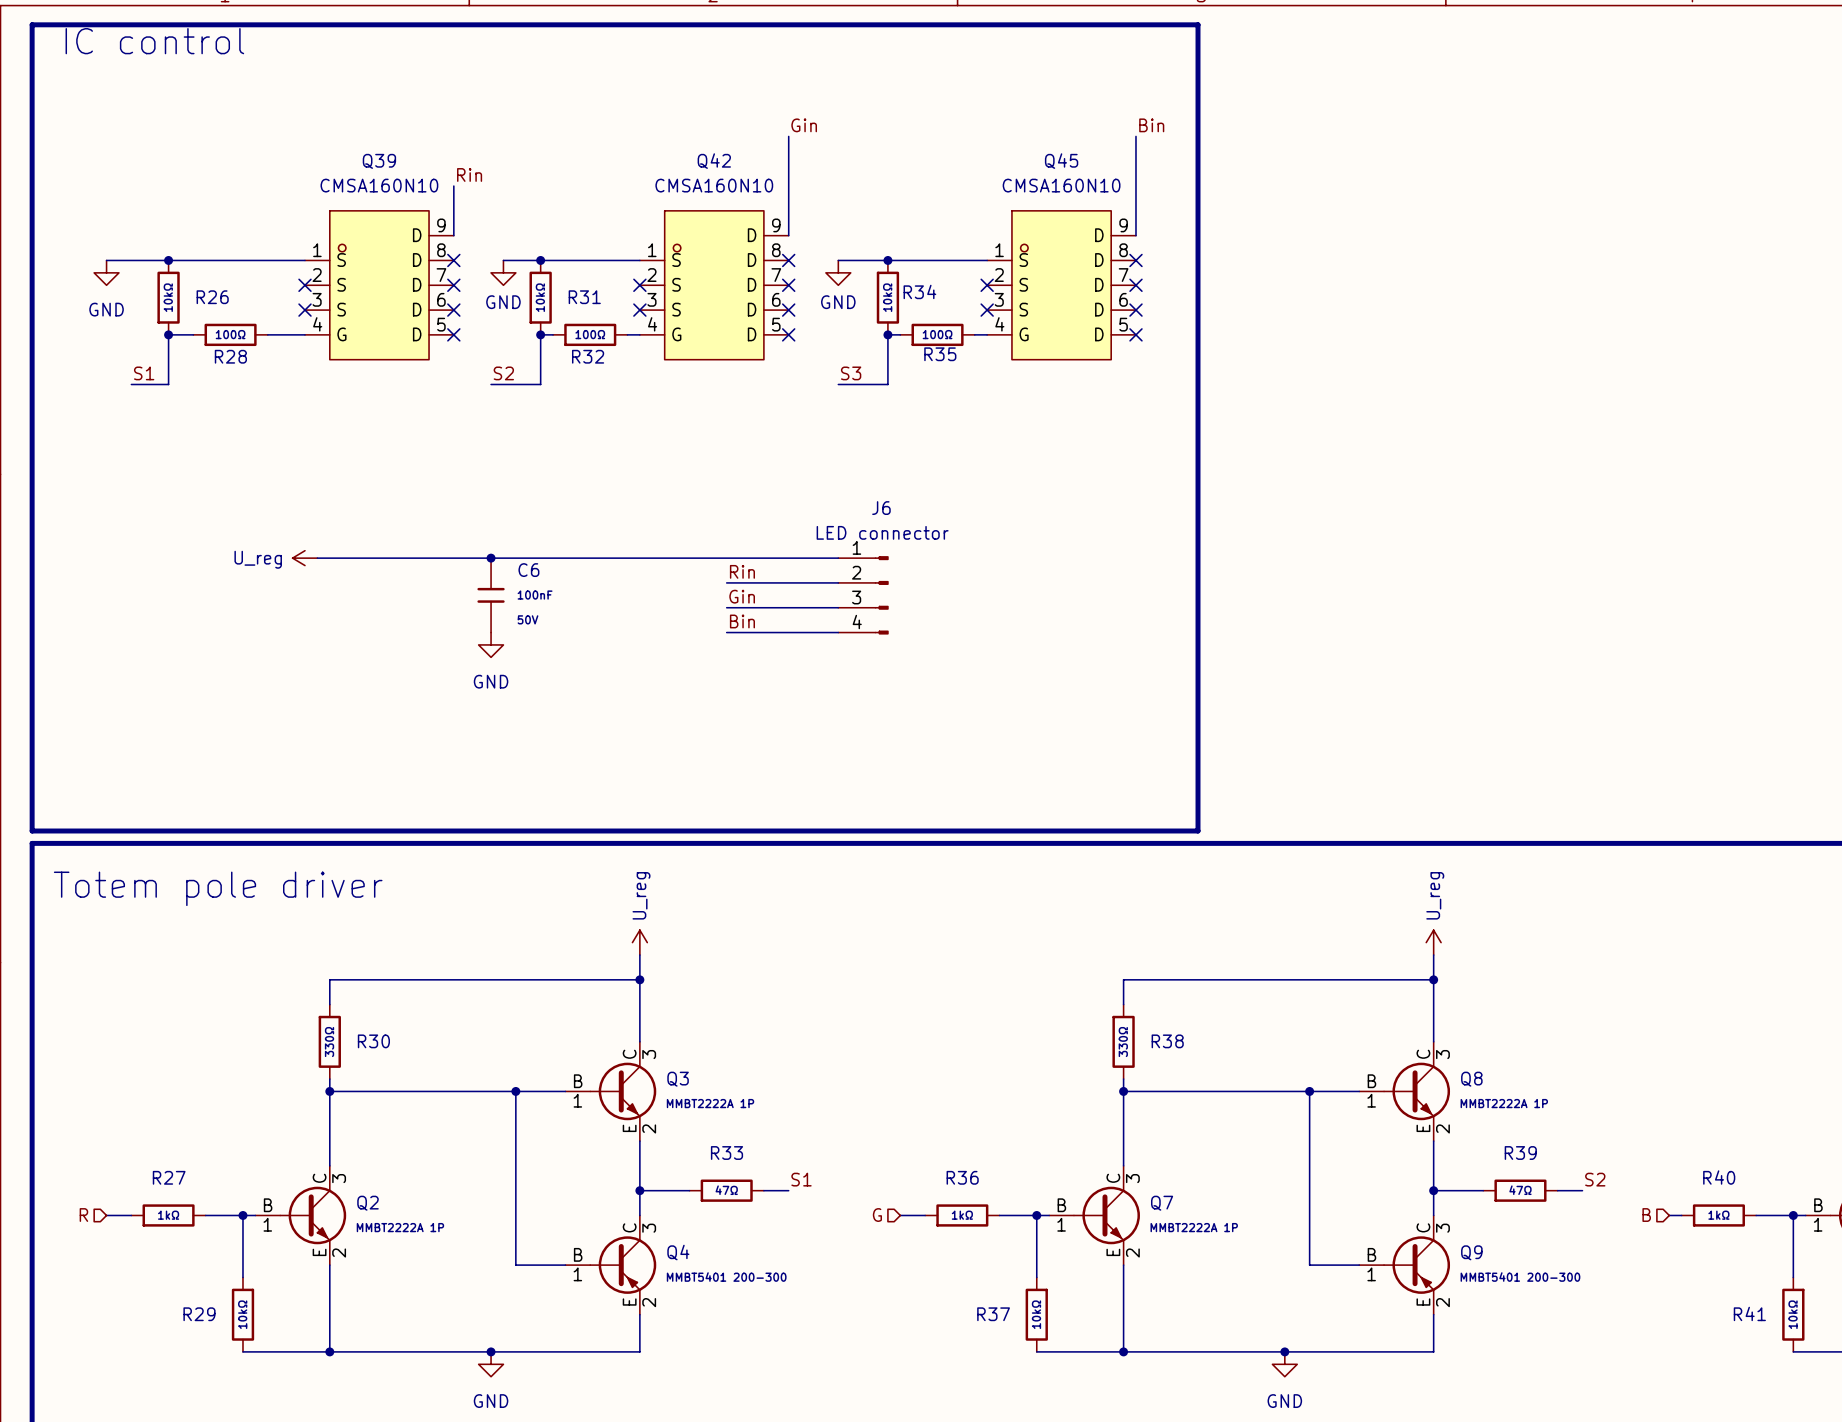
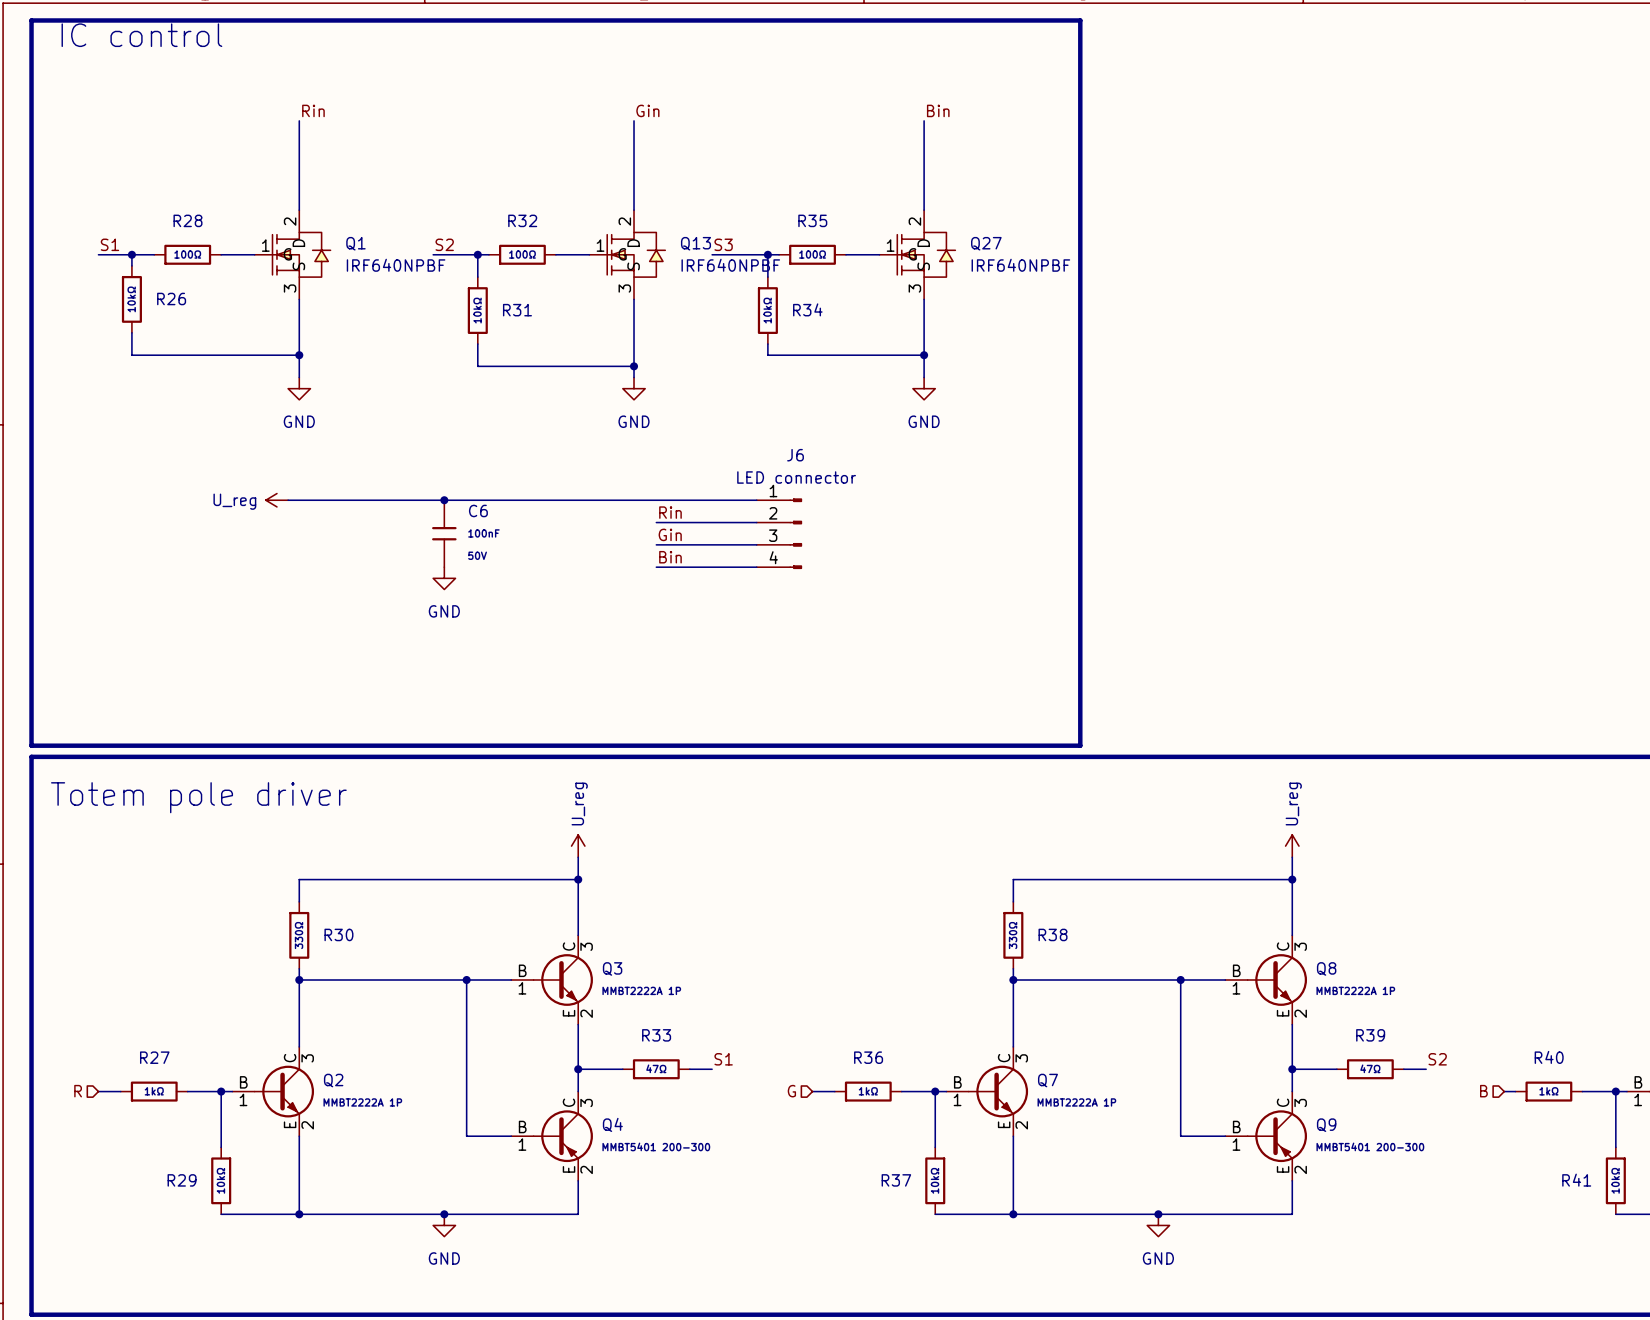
label position: Gin (804, 125) -> Gin (647, 110)
label position: Bin (1151, 125) -> Bin (938, 110)
wire: none -> (299, 120) (299, 210)
wire: (788, 136) (788, 235) -> (634, 120) (634, 210)
wire: (1135, 136) (1135, 235) -> (924, 120) (924, 210)
label position: Rin (469, 174) -> Rin (313, 110)
wire: (453, 186) (453, 235) -> none
wire: (106, 260) (305, 260) -> none
junction: (168, 260) -> none
no-connect mark: (453, 260) -> none
wire: (503, 260) (639, 260) -> none
junction: (540, 260) -> none
no-connect mark: (788, 260) -> none
wire: (838, 260) (987, 260) -> none
junction: (887, 260) -> none
no-connect mark: (1135, 260) -> none
power symbol: GND (106, 272) -> none
power symbol: GND (503, 272) -> none
power symbol: GND (838, 272) -> none
wire: none -> (98, 254) (154, 254)
wire: none -> (131, 254) (131, 265)
junction: none -> (131, 254)
no-connect mark: (305, 285) -> none
Q1: none -> IRF640NPBF (292, 254)
Q39: CMSA160N10 (379, 285) -> none
no-connect mark: (453, 285) -> none
wire: none -> (433, 254) (488, 254)
wire: none -> (477, 254) (477, 277)
junction: none -> (477, 254)
wire: none -> (555, 254) (589, 254)
no-connect mark: (639, 285) -> none
Q13: none -> IRF640NPBF (627, 254)
Q42: CMSA160N10 (714, 285) -> none
wire: none -> (712, 254) (779, 254)
no-connect mark: (788, 285) -> none
wire: none -> (767, 254) (767, 277)
junction: none -> (767, 254)
wire: none -> (845, 254) (879, 254)
no-connect mark: (987, 285) -> none
Q27: none -> IRF640NPBF (917, 254)
Q45: CMSA160N10 (1061, 285) -> none
no-connect mark: (1135, 285) -> none
R34 name position: R34 (919, 291) -> R34 (807, 309)
R26 position: (168, 297) -> (131, 299)
R31 position: (540, 297) -> (477, 310)
R34 position: (887, 297) -> (767, 310)
no-connect mark: (305, 310) -> none
no-connect mark: (453, 310) -> none
no-connect mark: (639, 310) -> none
no-connect mark: (788, 310) -> none
no-connect mark: (987, 310) -> none
no-connect mark: (1135, 310) -> none
junction: (168, 334) -> none
wire: (193, 334) (168, 334) (168, 384) (131, 384) -> none
R28 position: (230, 334) -> (187, 254)
wire: (267, 334) (305, 334) -> (221, 254) (254, 254)
wire: none -> (299, 299) (299, 377)
no-connect mark: (453, 334) -> none
junction: (540, 334) -> none
wire: (553, 334) (540, 334) (540, 384) (491, 384) -> none
R32 position: (590, 334) -> (522, 254)
wire: (627, 334) (639, 334) -> none
wire: none -> (634, 299) (634, 377)
no-connect mark: (788, 334) -> none
junction: (887, 334) -> none
wire: (900, 334) (887, 334) (887, 384) (838, 384) -> none
R35 position: (937, 334) -> (812, 254)
wire: (974, 334) (987, 334) -> none
wire: none -> (924, 299) (924, 377)
no-connect mark: (1135, 334) -> none
R35 name position: R35 (940, 354) -> R35 (812, 220)
R28 name position: R28 (230, 356) -> R28 (187, 220)
R32 name position: R32 (588, 356) -> R32 (522, 220)
wire: none -> (131, 332) (131, 355) (299, 355)
label position: S1 (144, 373) -> S1 (109, 244)
label position: S2 (503, 373) -> S2 (444, 244)
label position: S3 (851, 373) -> S3 (723, 244)
wire: none -> (477, 344) (477, 366) (634, 366)
wire: none -> (767, 344) (767, 355) (924, 355)
junction: none -> (299, 355)
junction: none -> (924, 355)
junction: none -> (634, 366)
power symbol: none -> GND (299, 388)
power symbol: none -> GND (634, 388)
power symbol: none -> GND (924, 388)

